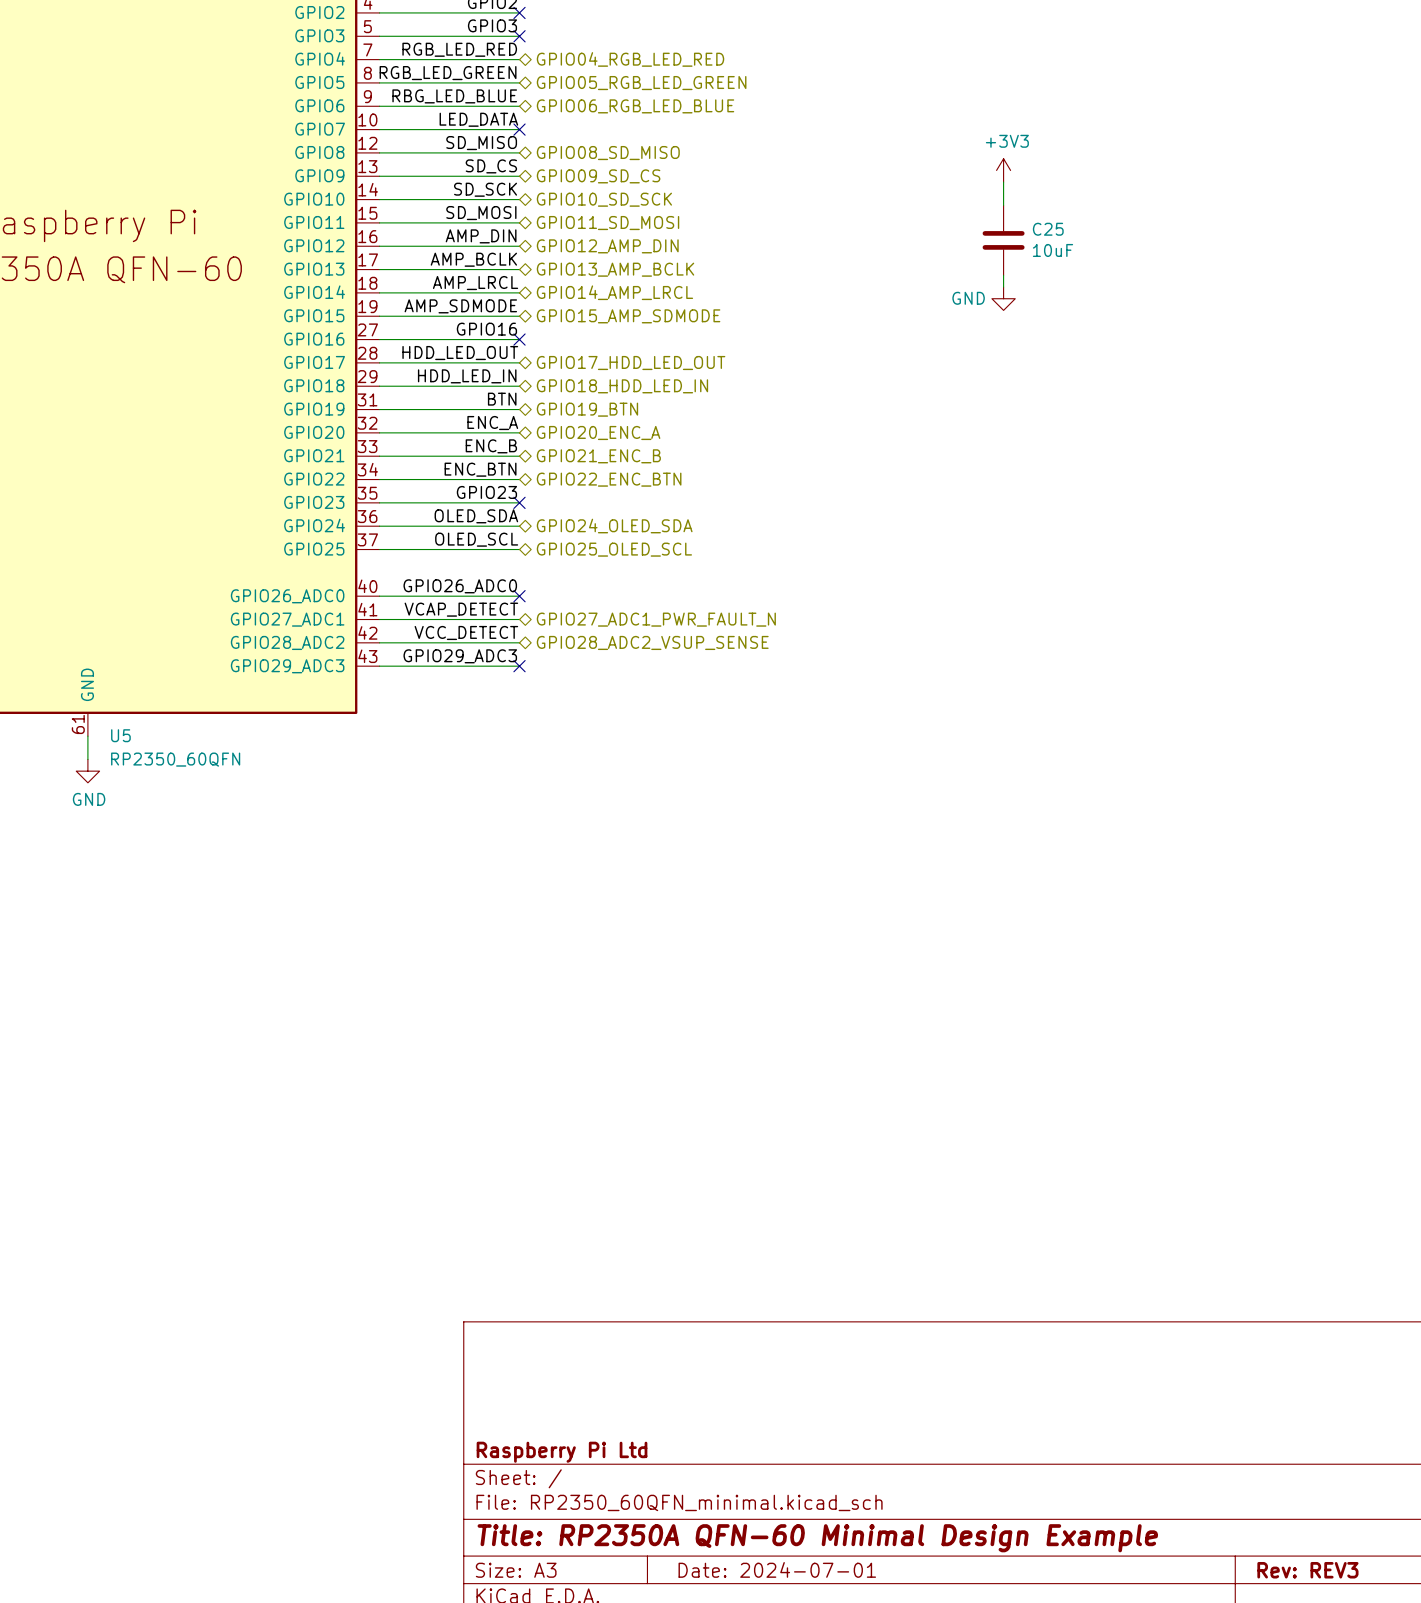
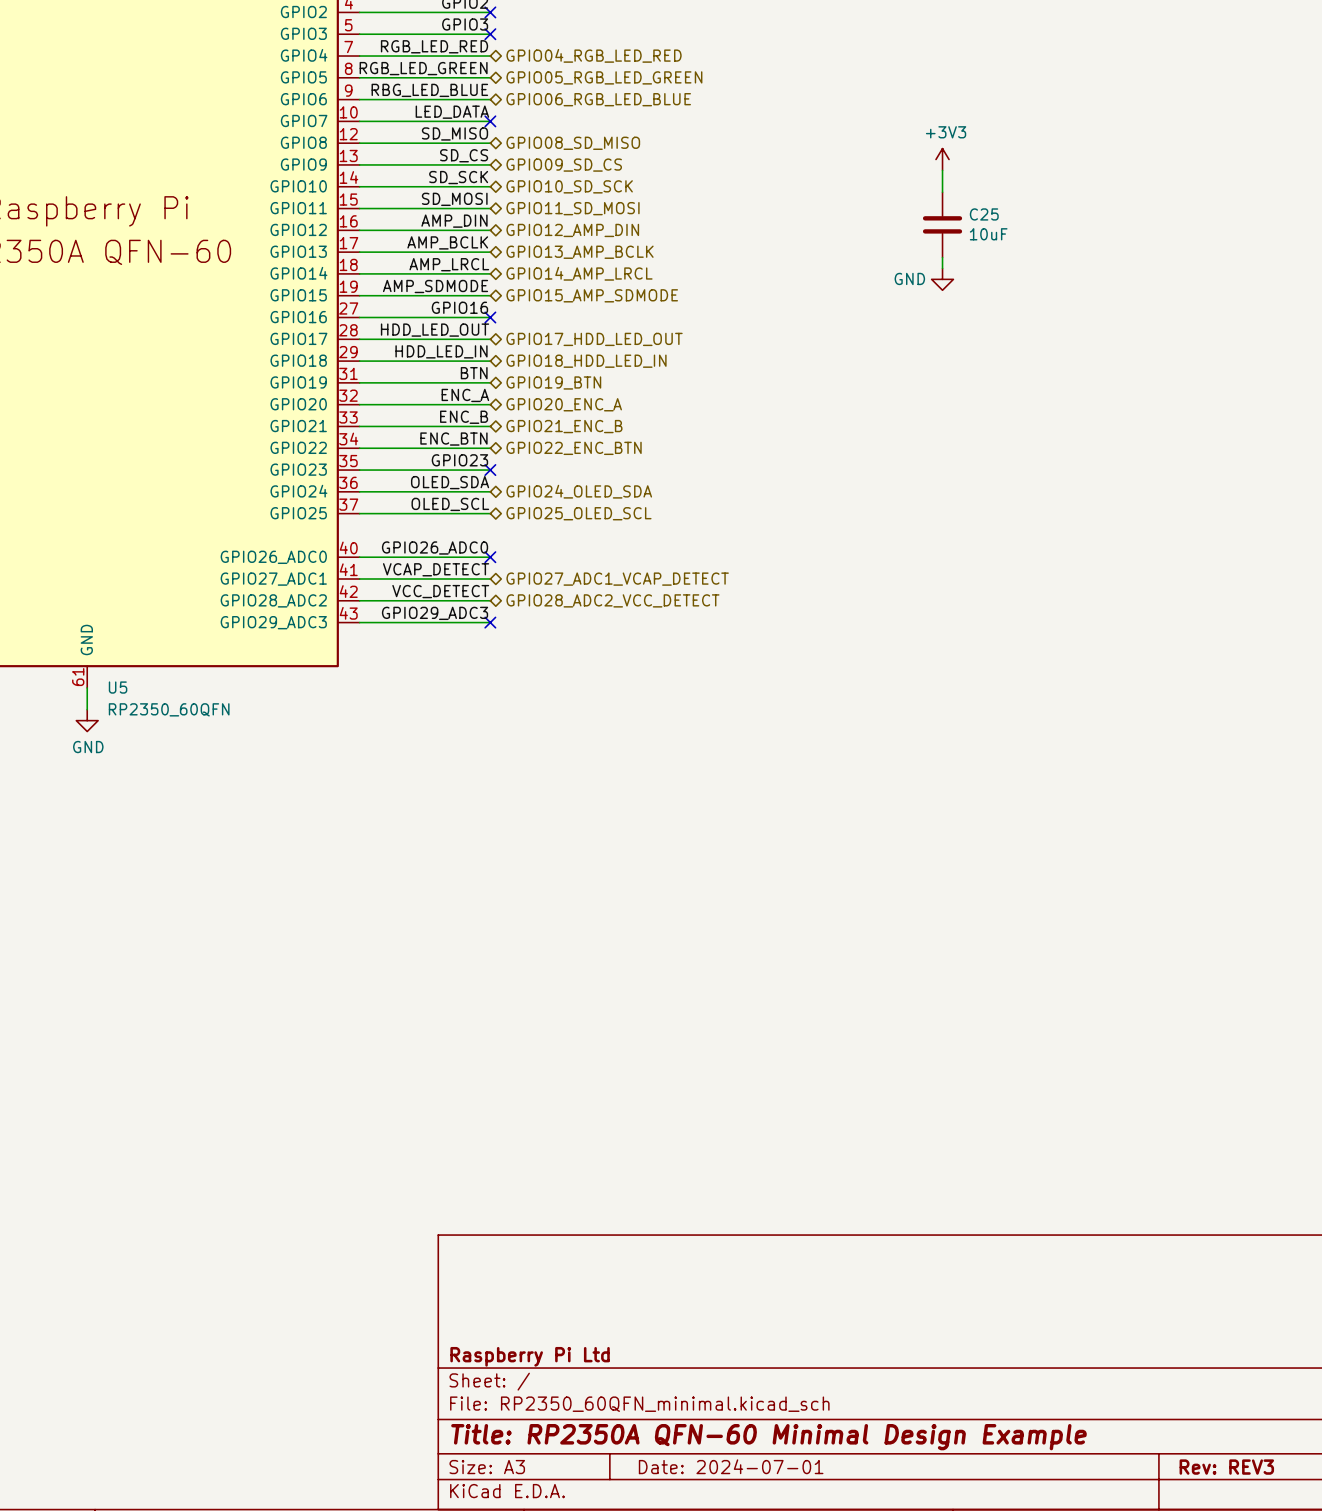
hierarchical label: GPIO27_ADC1_PWR_FAULT_N (656, 619) -> GPIO27_ADC1_VCAP_DETECT (617, 579)
hierarchical label: GPIO28_ADC2_VSUP_SENSE (652, 642) -> GPIO28_ADC2_VCC_DETECT (612, 600)

